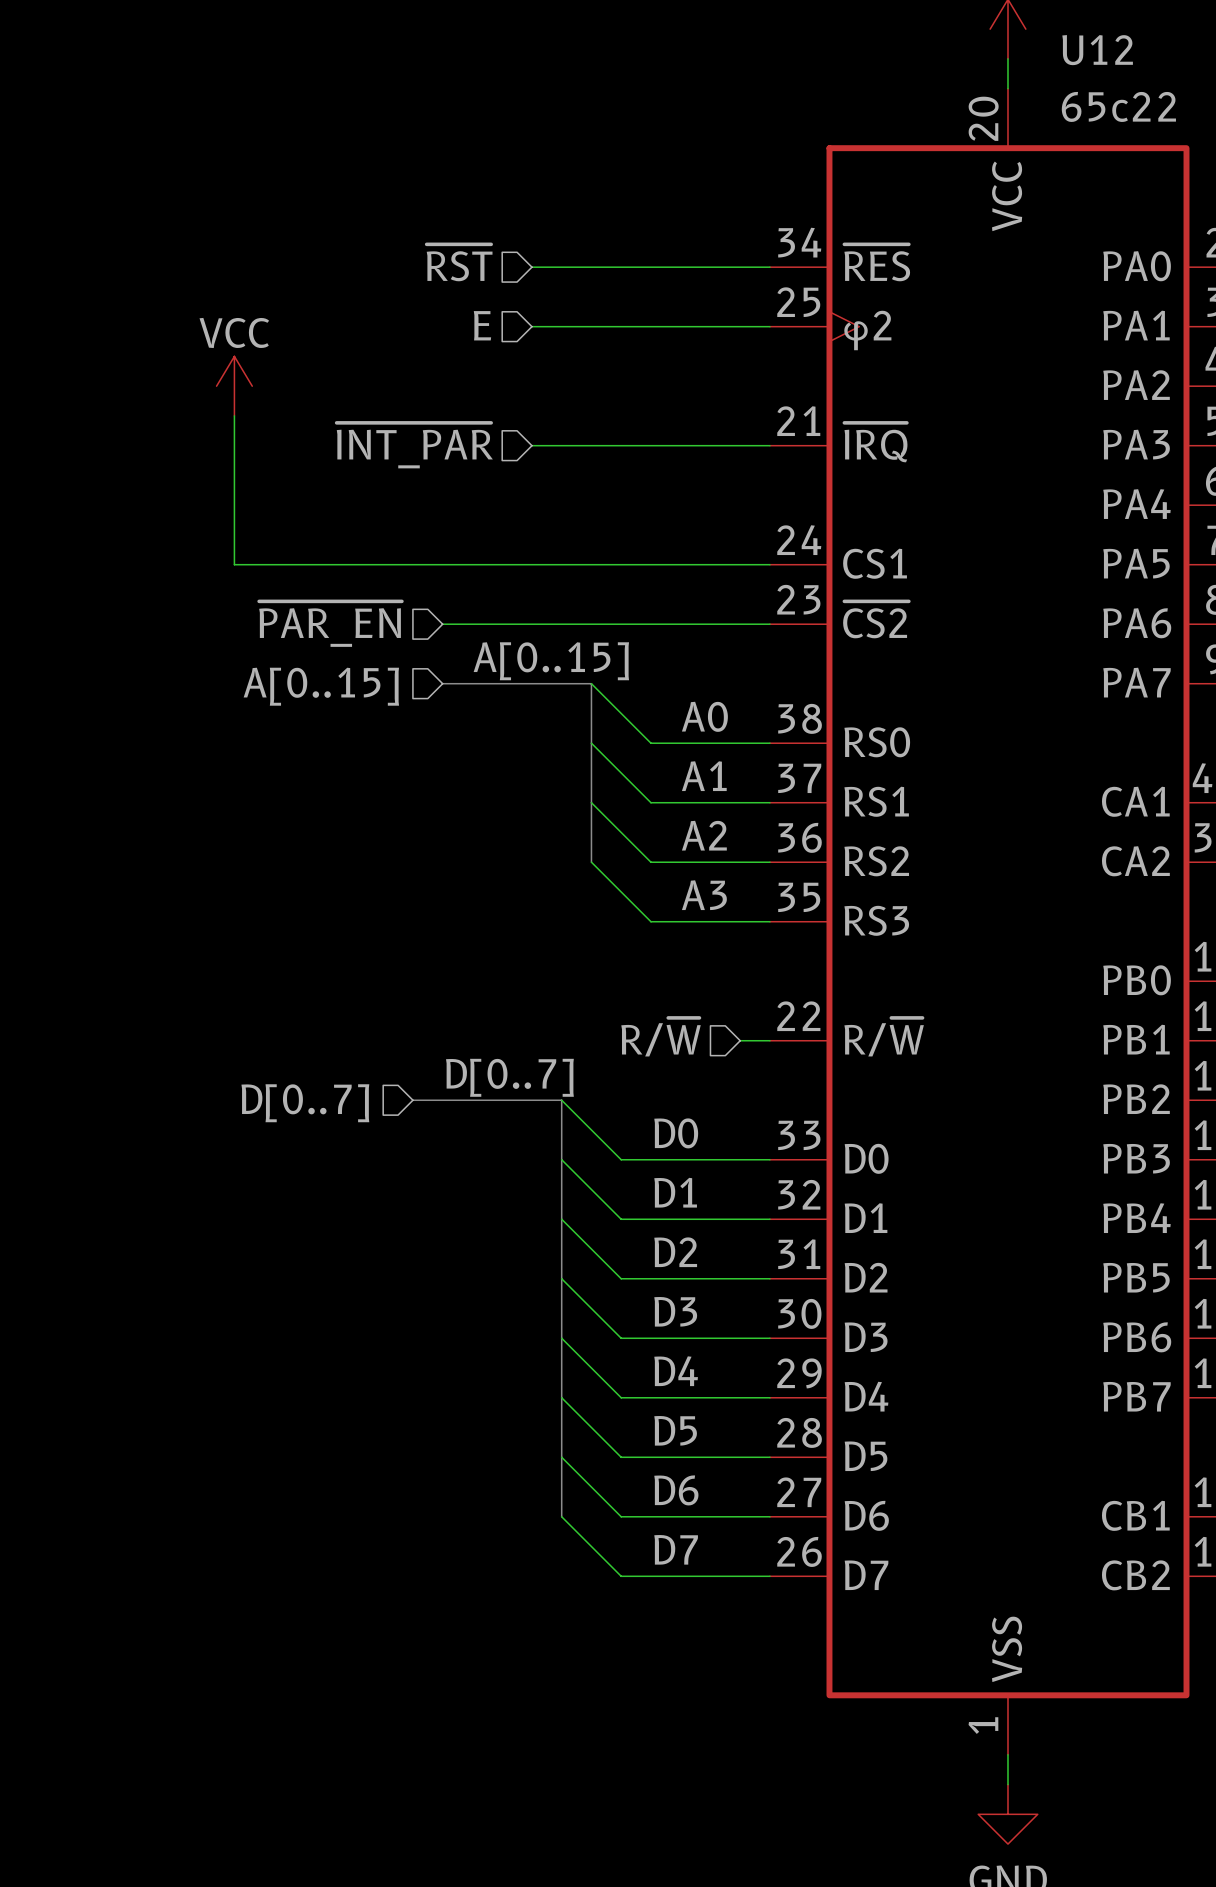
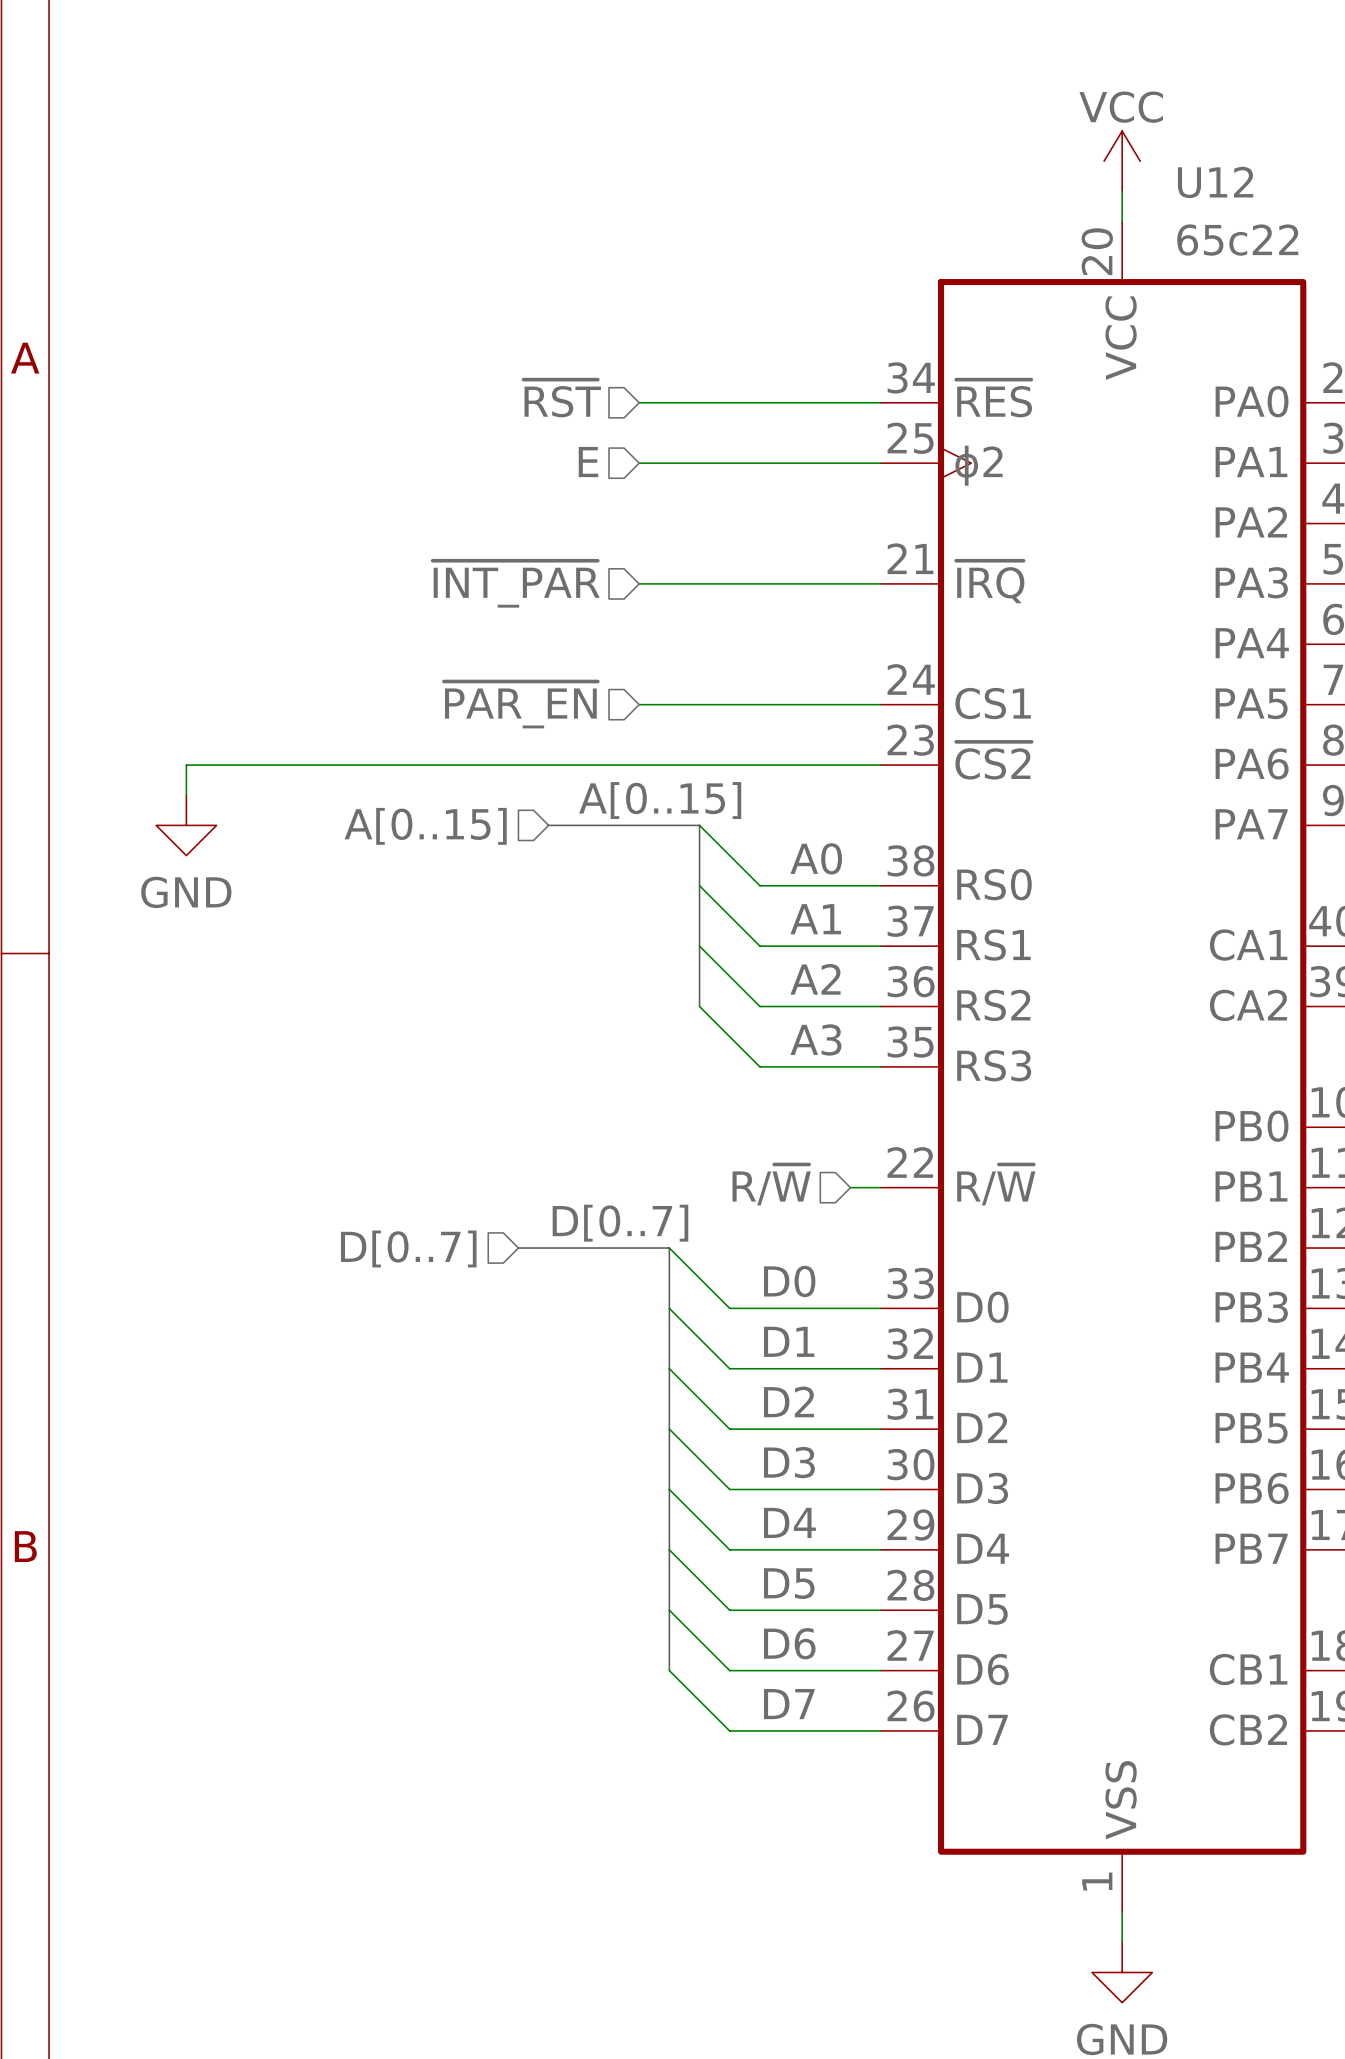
power symbol: VCC (234, 386) -> none
wire: (234, 415) (234, 564) (531, 564) -> none
hierarchical label position: ~{PAR_EN} (330, 624) -> ~{PAR_EN} (520, 704)
wire: none -> (548, 765) (186, 765) (186, 795)
power symbol: none -> GND (186, 825)

